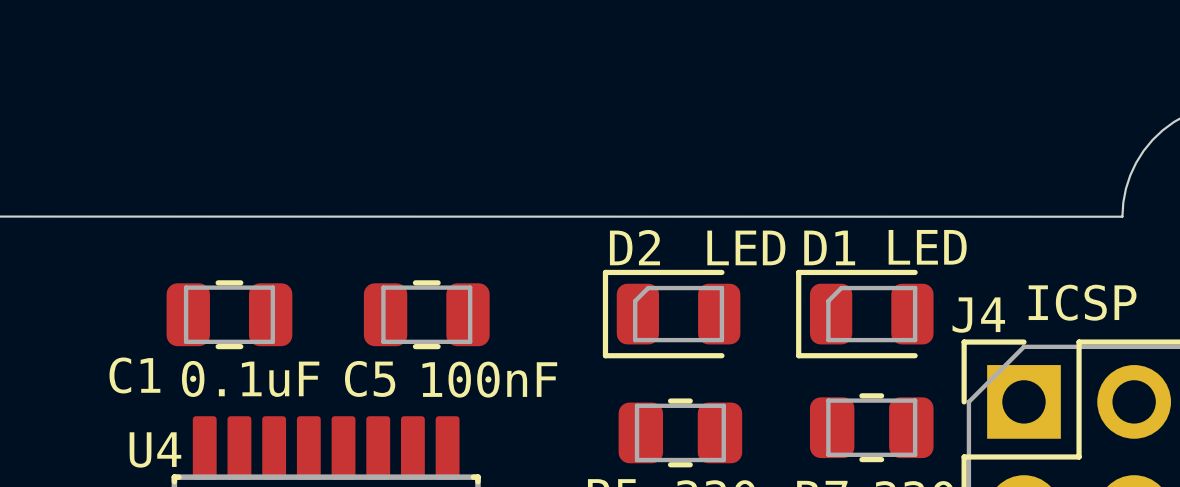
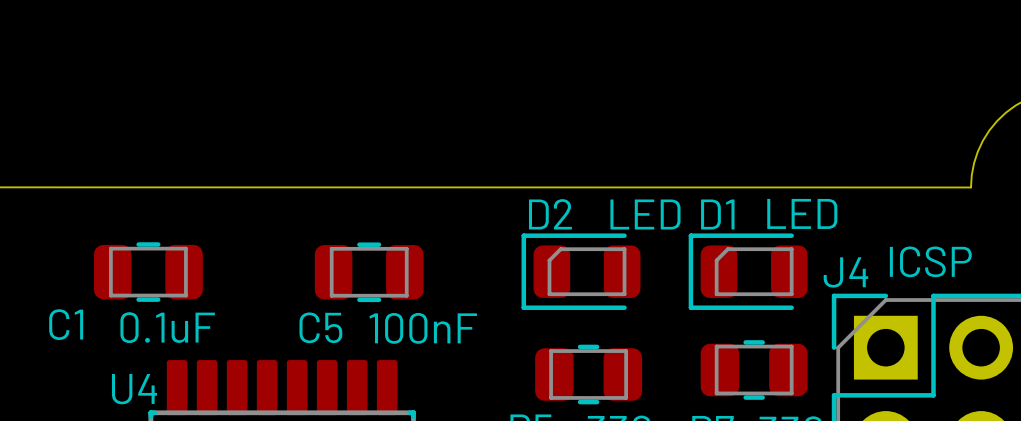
C1 position: (229, 314) -> (148, 272)

